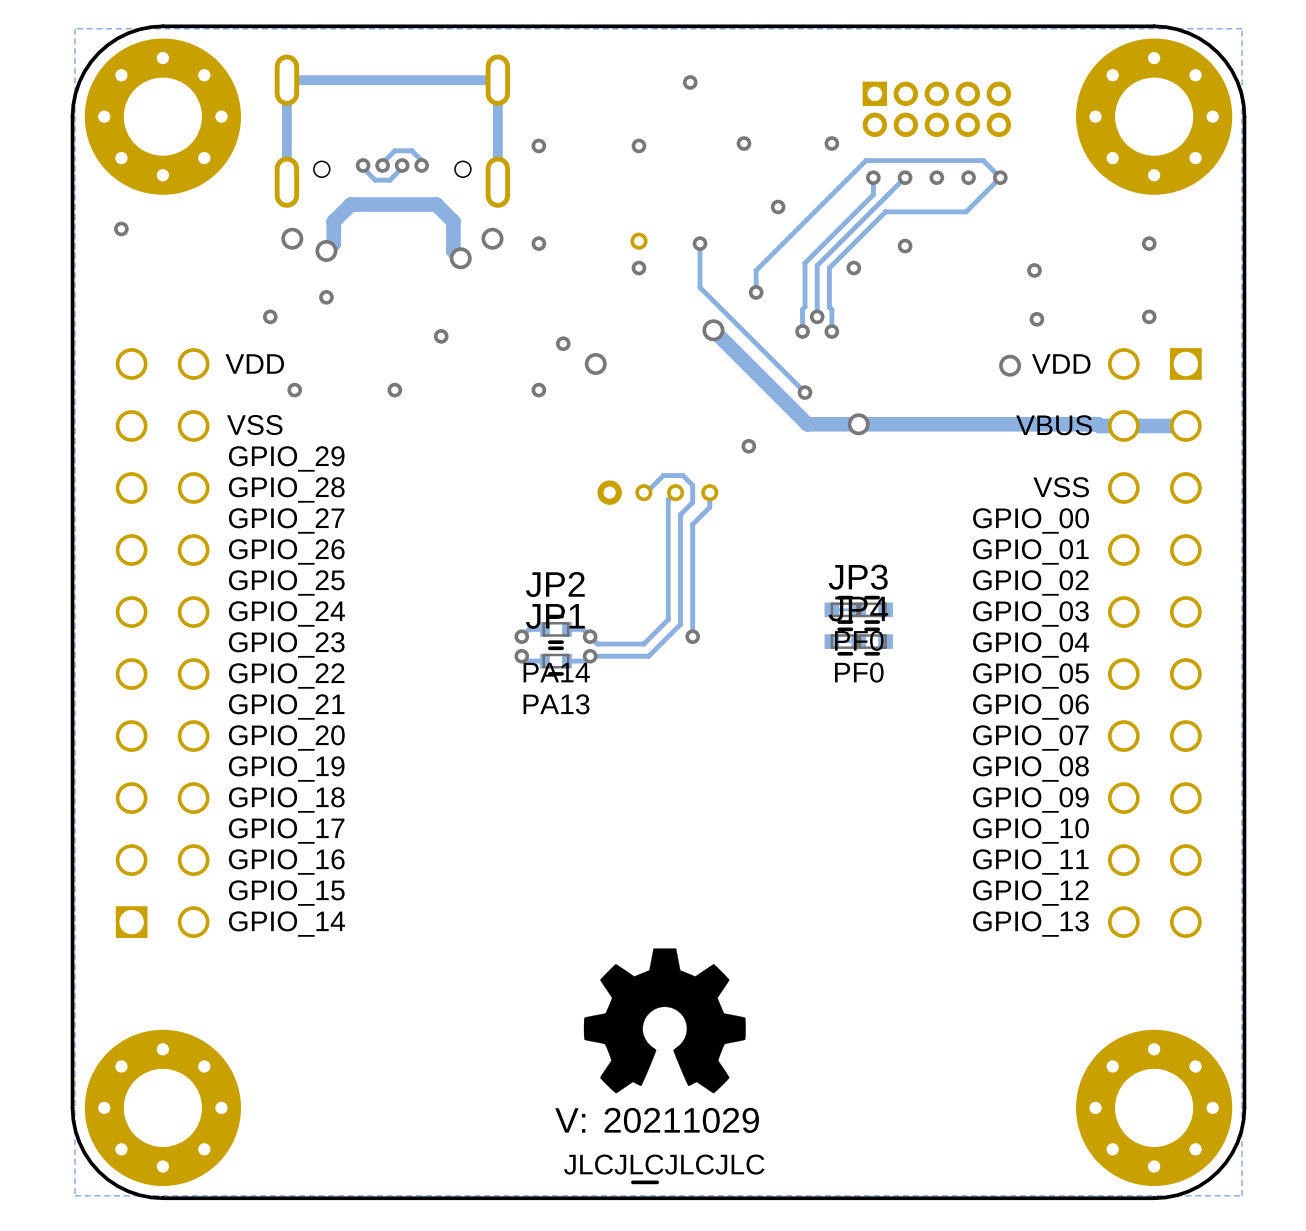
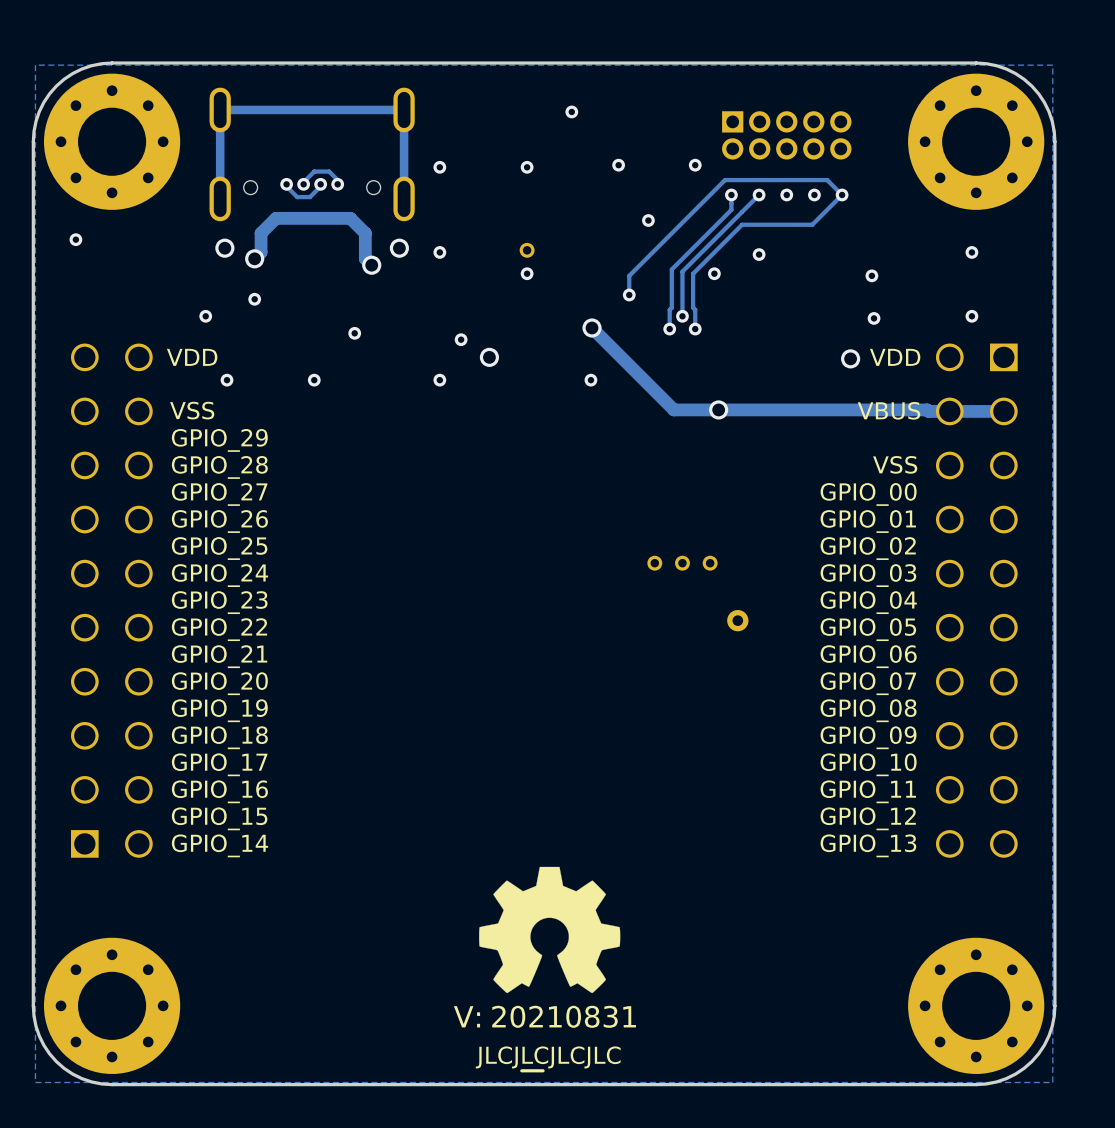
track: (700, 243) (700, 287) (804, 392) -> none
via: (700, 243) -> none
via: none -> (590, 380)
via: (804, 392) -> none
via: (748, 446) -> none
part position: (609, 492) -> (737, 620)
part: (643, 492) -> none
track: (646, 492) (663, 475) (682, 475) (692, 485) (692, 502) (680, 514) (680, 624) (648, 656) (590, 656) (585, 661) (566, 661) -> none
track: (675, 492) (668, 499) (668, 619) (643, 644) (597, 644) (582, 629) (566, 629) -> none
part: (675, 492) -> none
track: (709, 492) (709, 507) (692, 524) (692, 636) -> none
part: (709, 492) -> none
part: none -> (654, 563)
part: none -> (682, 563)
part: none -> (710, 563)
JP3: PF0 (858, 609) -> none
track: (544, 629) (529, 629) (521, 636) -> none
JP2: PA14 (555, 629) -> none
via: (521, 636) -> none
via: (590, 636) -> none
via: (692, 636) -> none
JP4: PF0 (858, 641) -> none
track: (521, 656) (526, 661) (544, 661) -> none
via: (521, 656) -> none
via: (590, 656) -> none
JP1: PA13 (555, 661) -> none
drawing shape: [555, 1107, 759, 1133] -> [453, 1005, 636, 1028]

